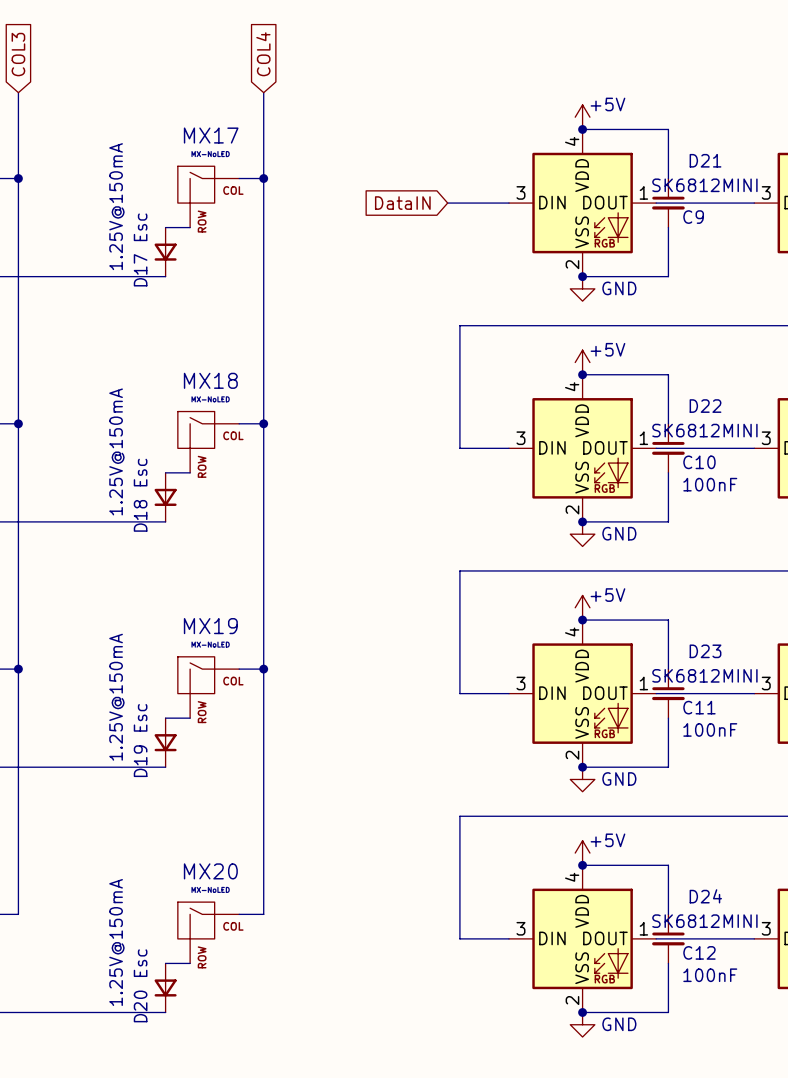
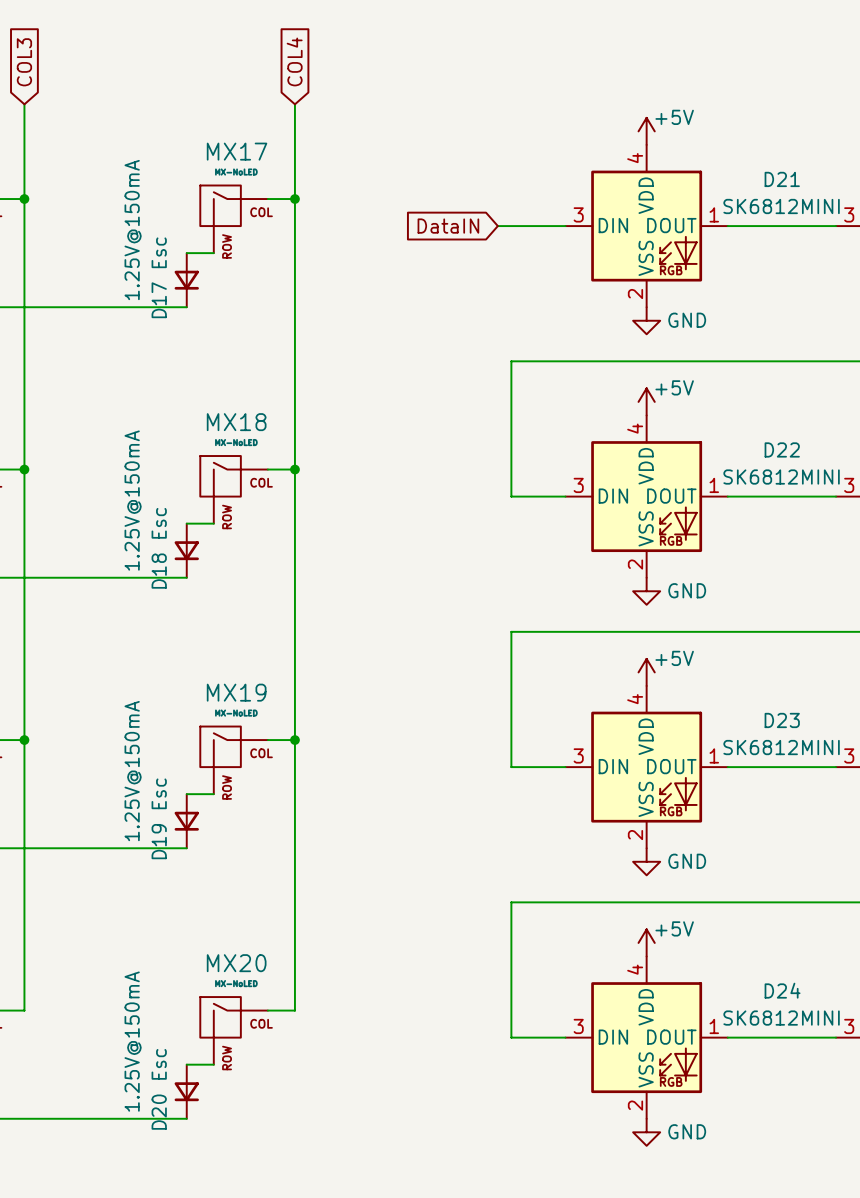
wire: (582, 129) (668, 129) (668, 178) -> none
junction: (582, 129) -> none
C9: (668, 203) -> none
wire: (668, 227) (668, 276) (582, 276) -> none
junction: (582, 276) -> none
wire: (582, 374) (668, 374) (668, 423) -> none
junction: (582, 374) -> none
C10: 100nF (668, 448) -> none
wire: (668, 472) (668, 521) (582, 521) -> none
junction: (582, 521) -> none
wire: (582, 620) (668, 620) (668, 669) -> none
junction: (582, 620) -> none
C11: 100nF (668, 693) -> none
wire: (668, 718) (668, 767) (582, 767) -> none
junction: (582, 767) -> none
wire: (582, 865) (668, 865) (668, 914) -> none
junction: (582, 865) -> none
C12: 100nF (668, 938) -> none
wire: (668, 963) (668, 1012) (582, 1012) -> none
junction: (582, 1012) -> none

